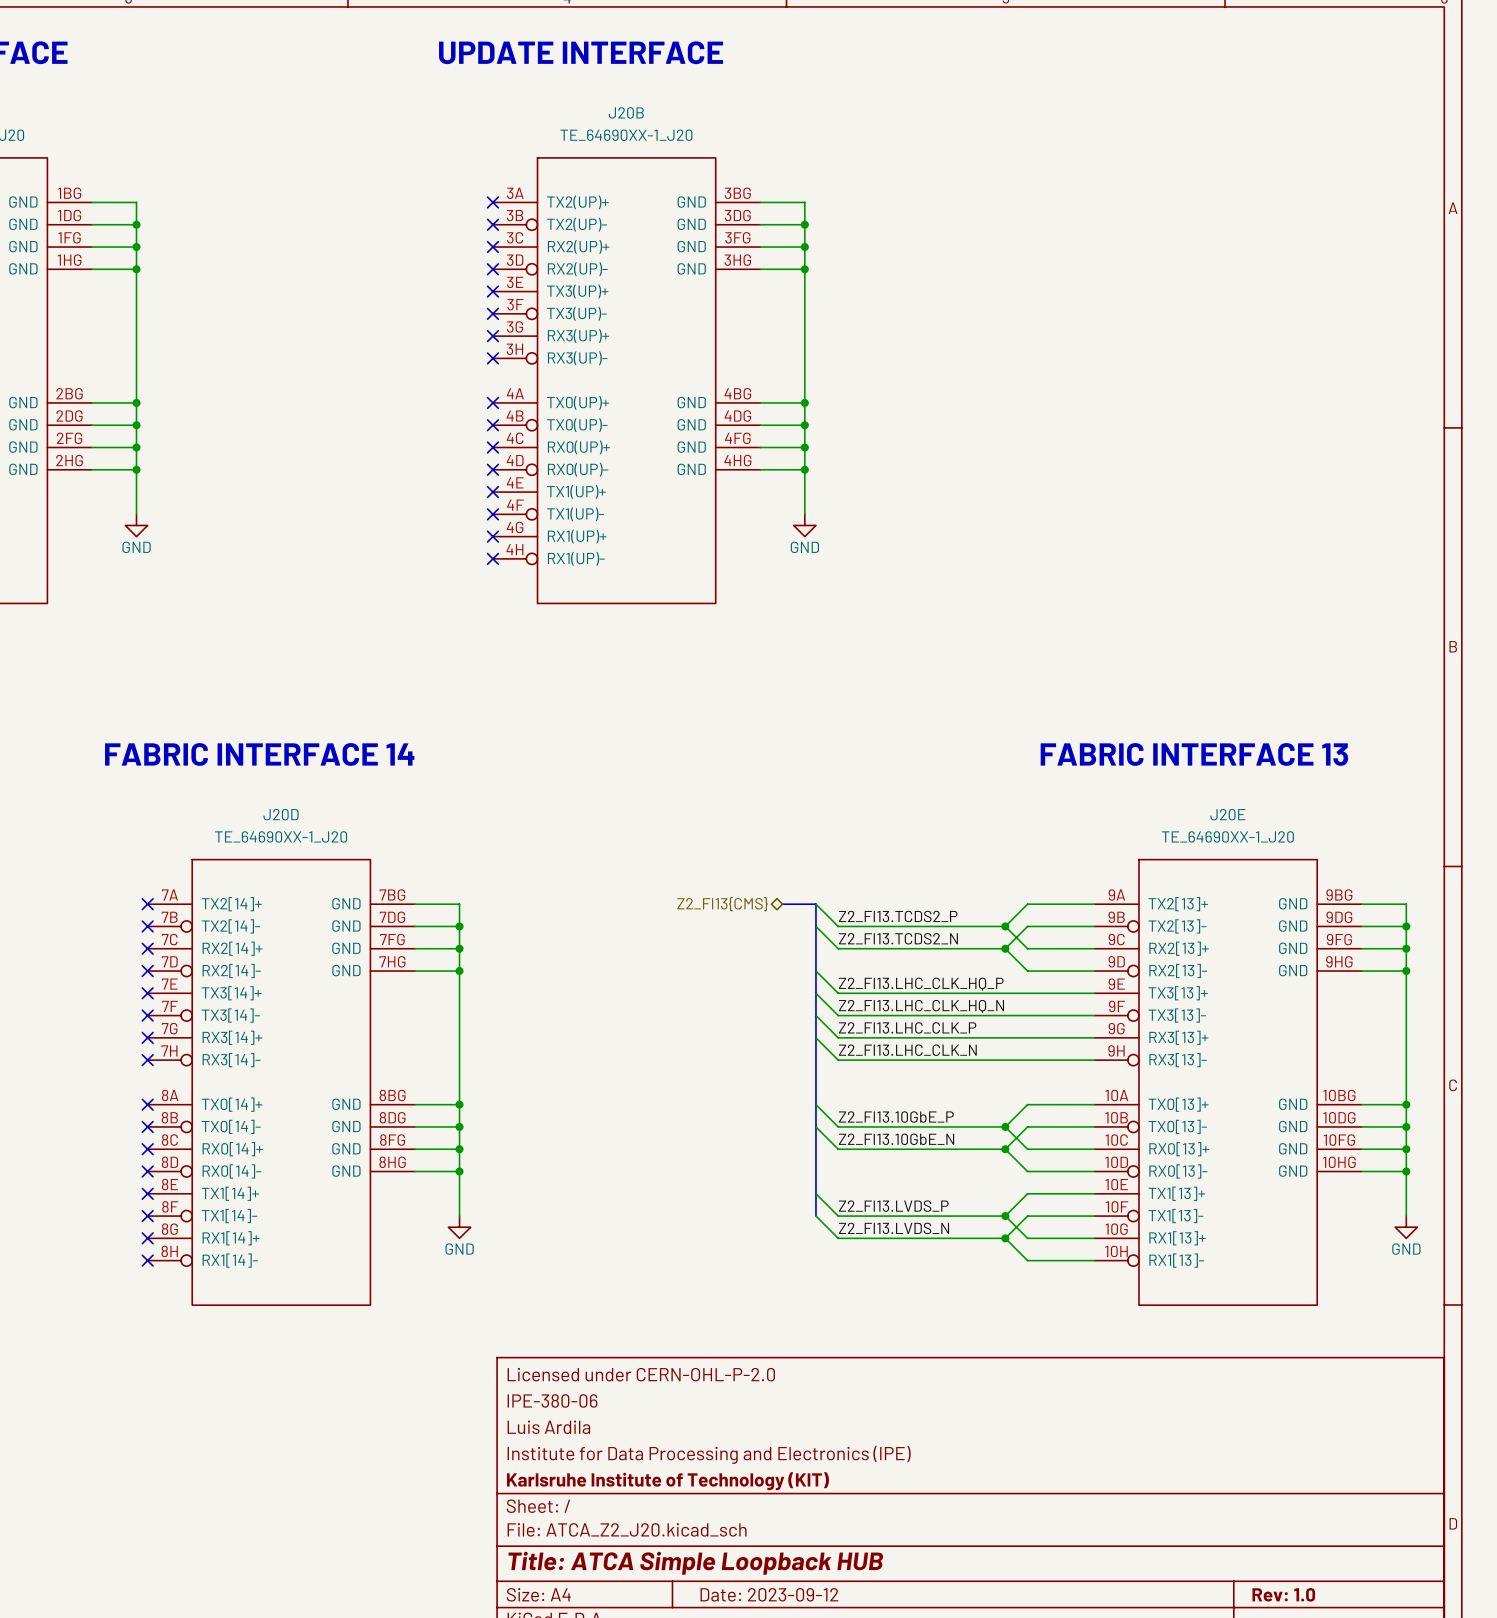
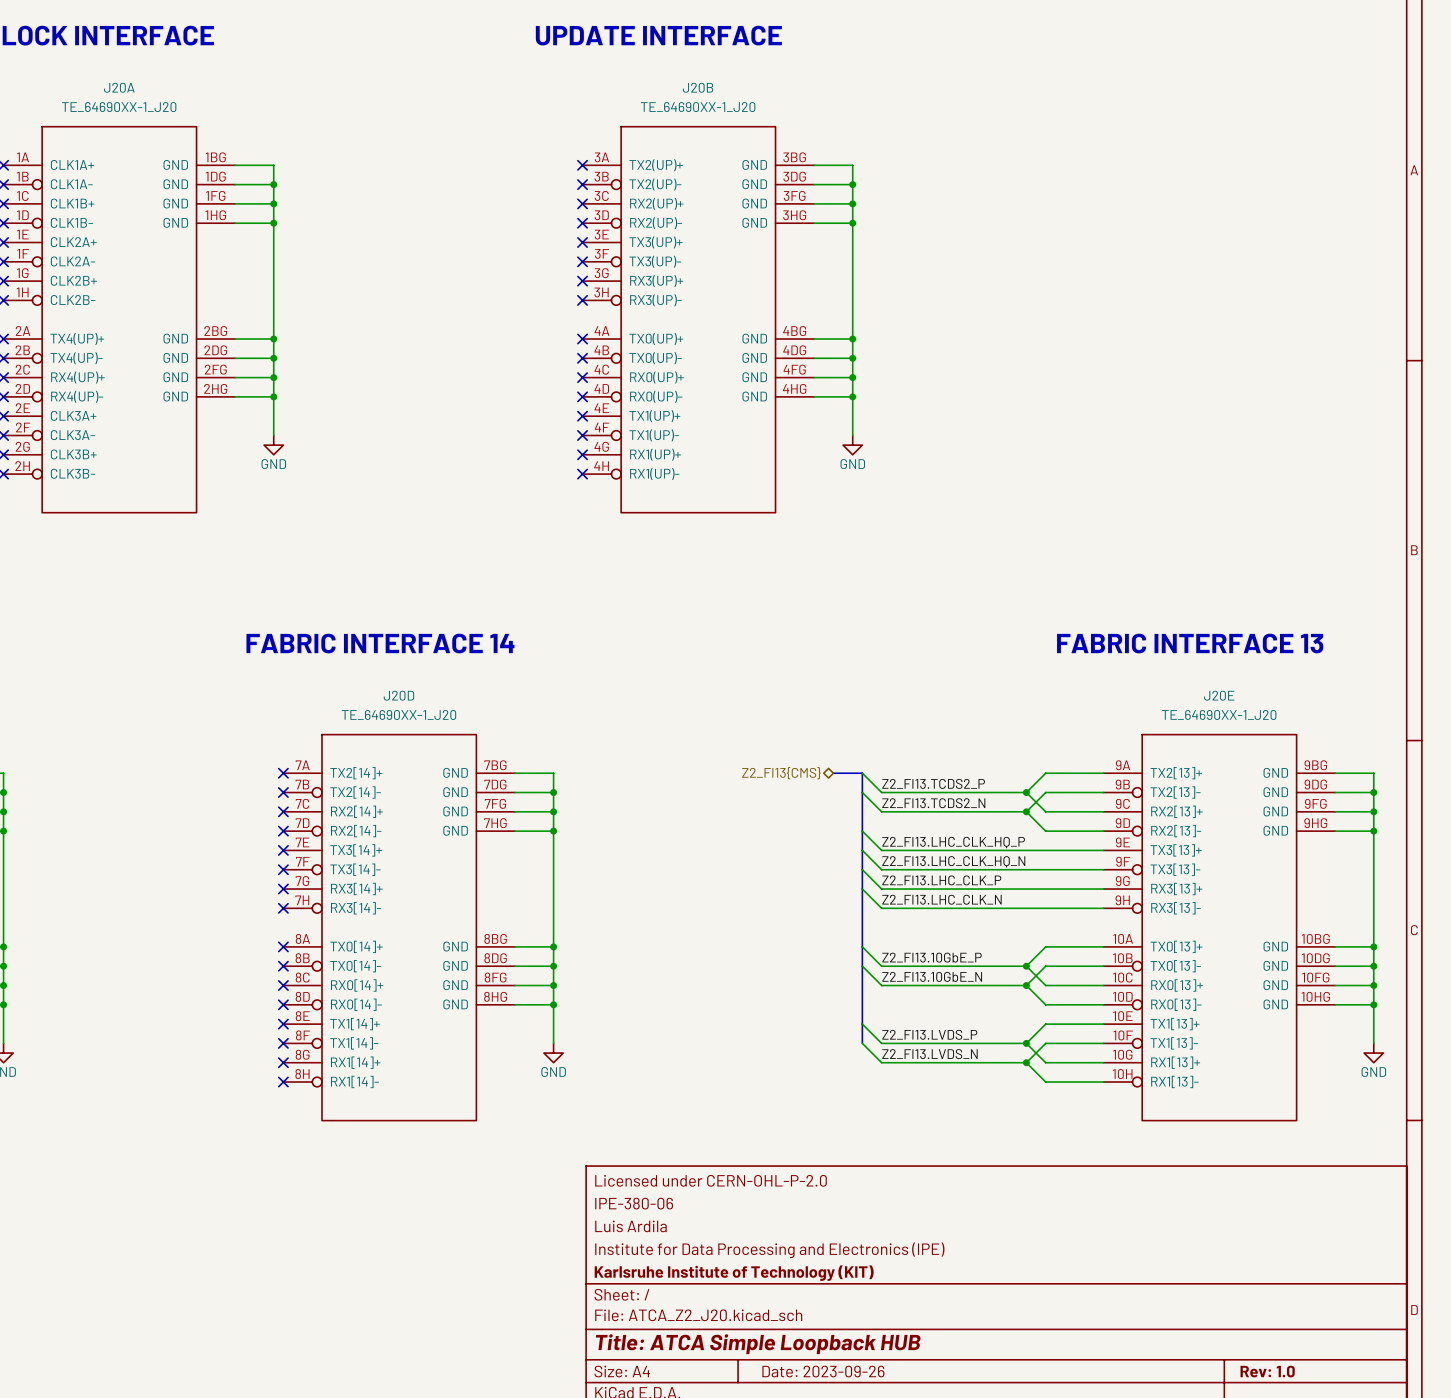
title block: Date: 2023-09-12 (769, 1594) -> Date: 2023-09-26 (823, 1371)

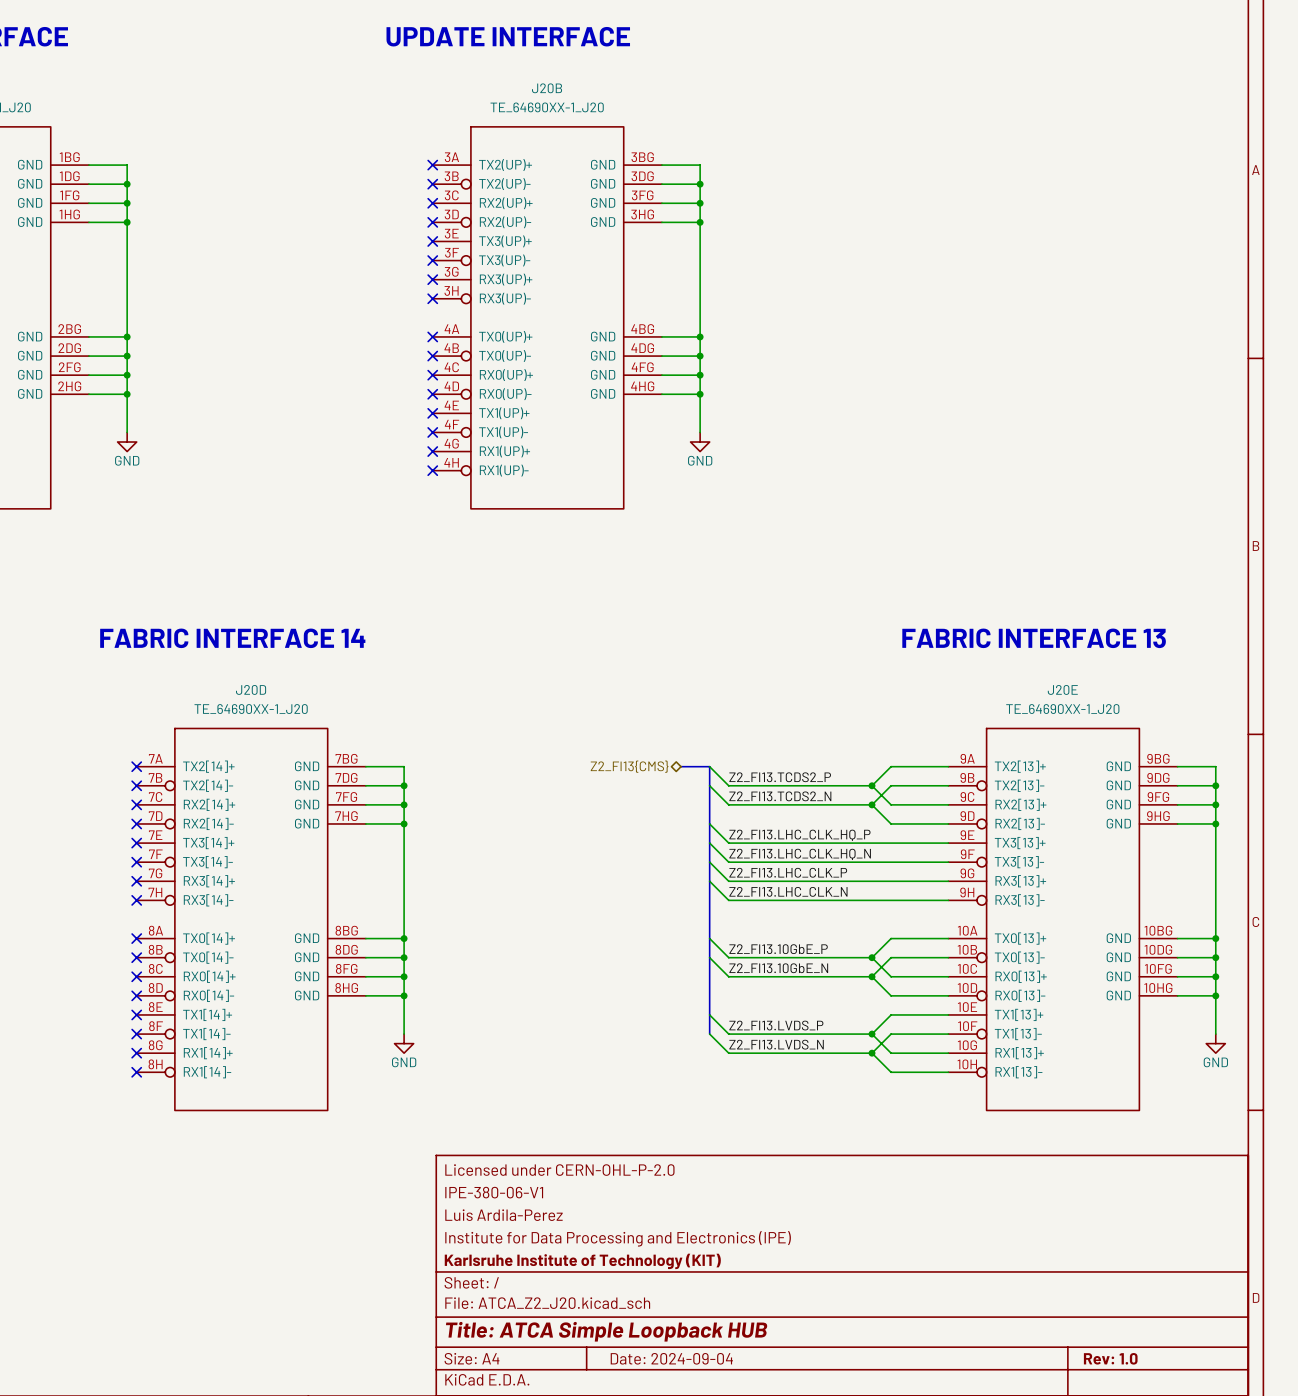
title block: IPE-380-06 (634, 1203) -> IPE-380-06-V1 (494, 1192)
title block: Luis Ardila (630, 1226) -> Luis Ardila-Perez (503, 1215)
title block: Date: 2023-09-26 (823, 1371) -> Date: 2024-09-04 (671, 1358)

